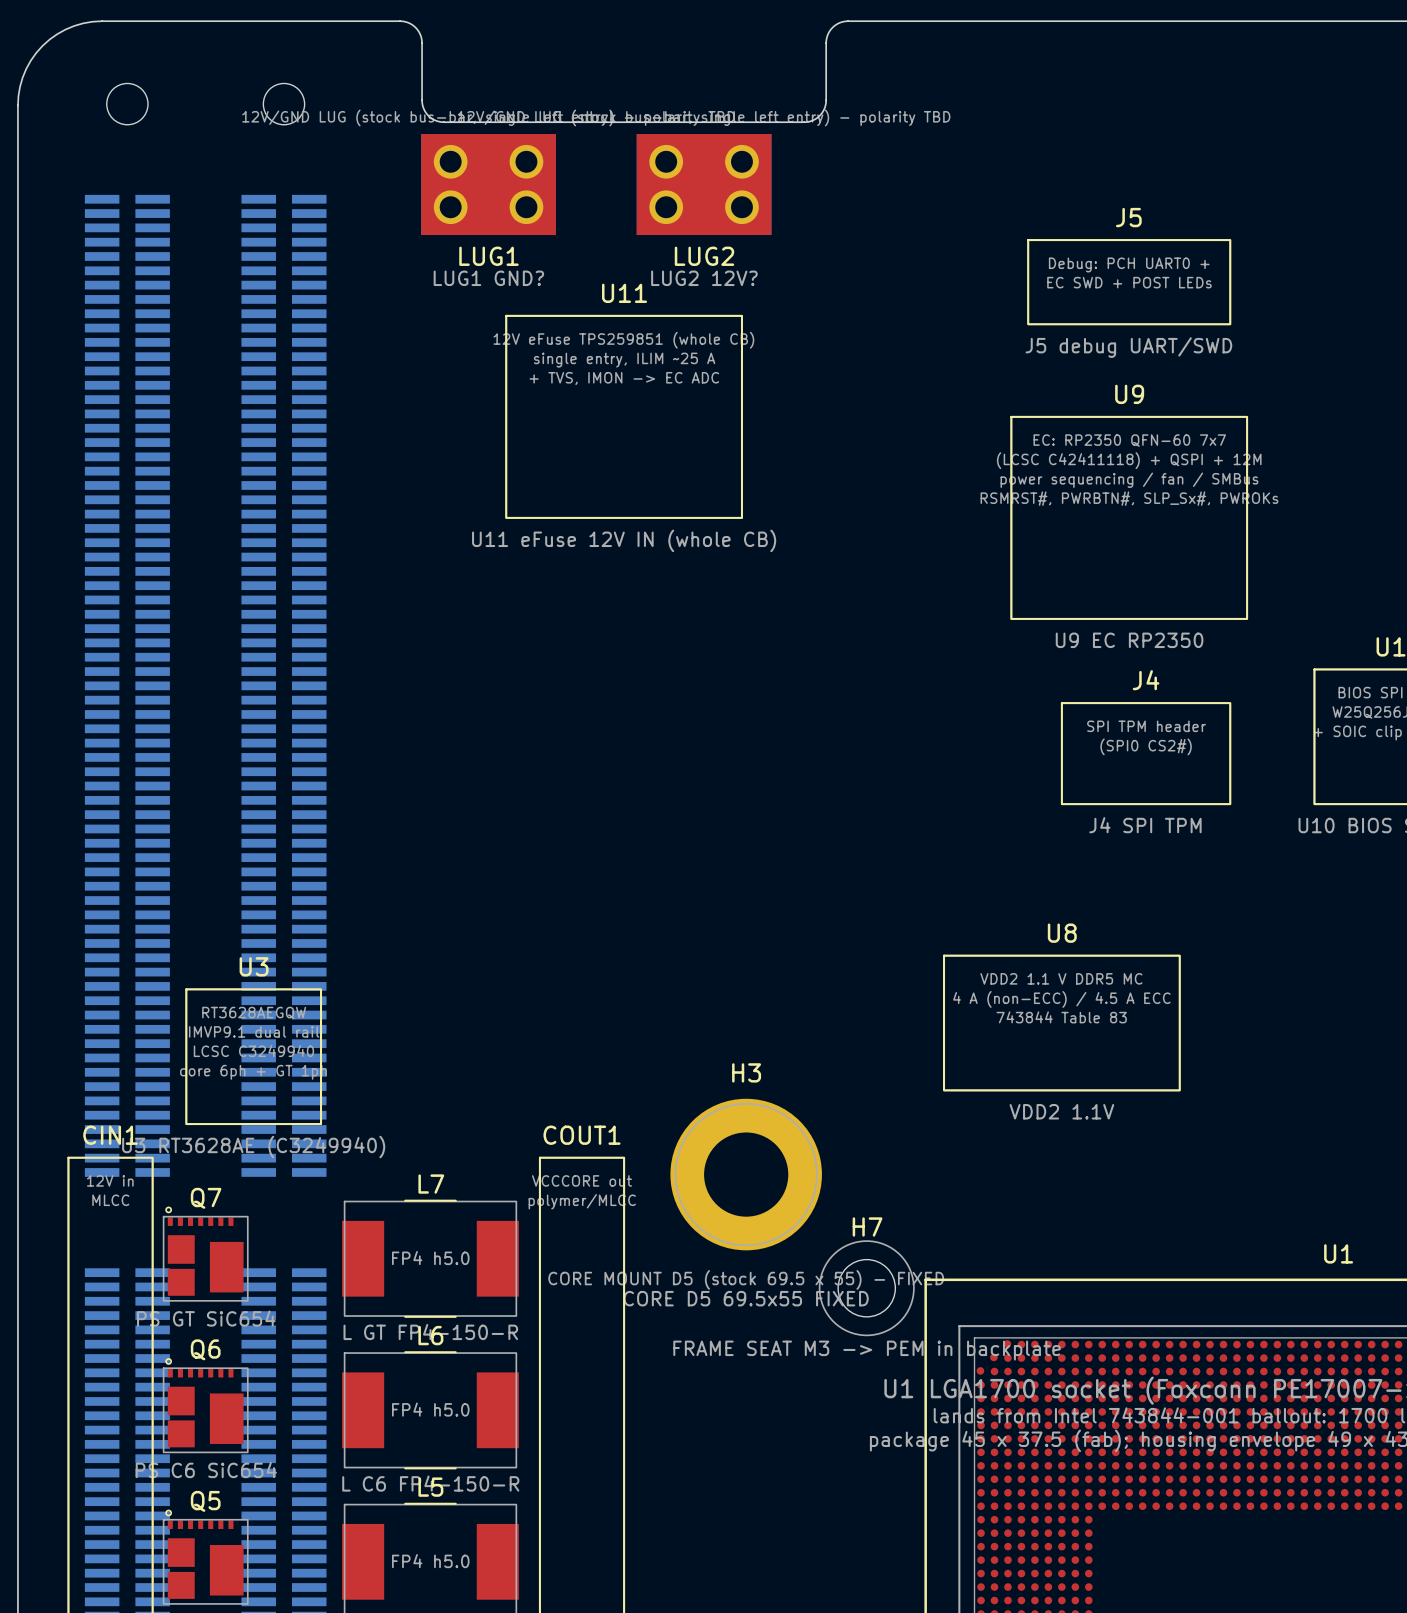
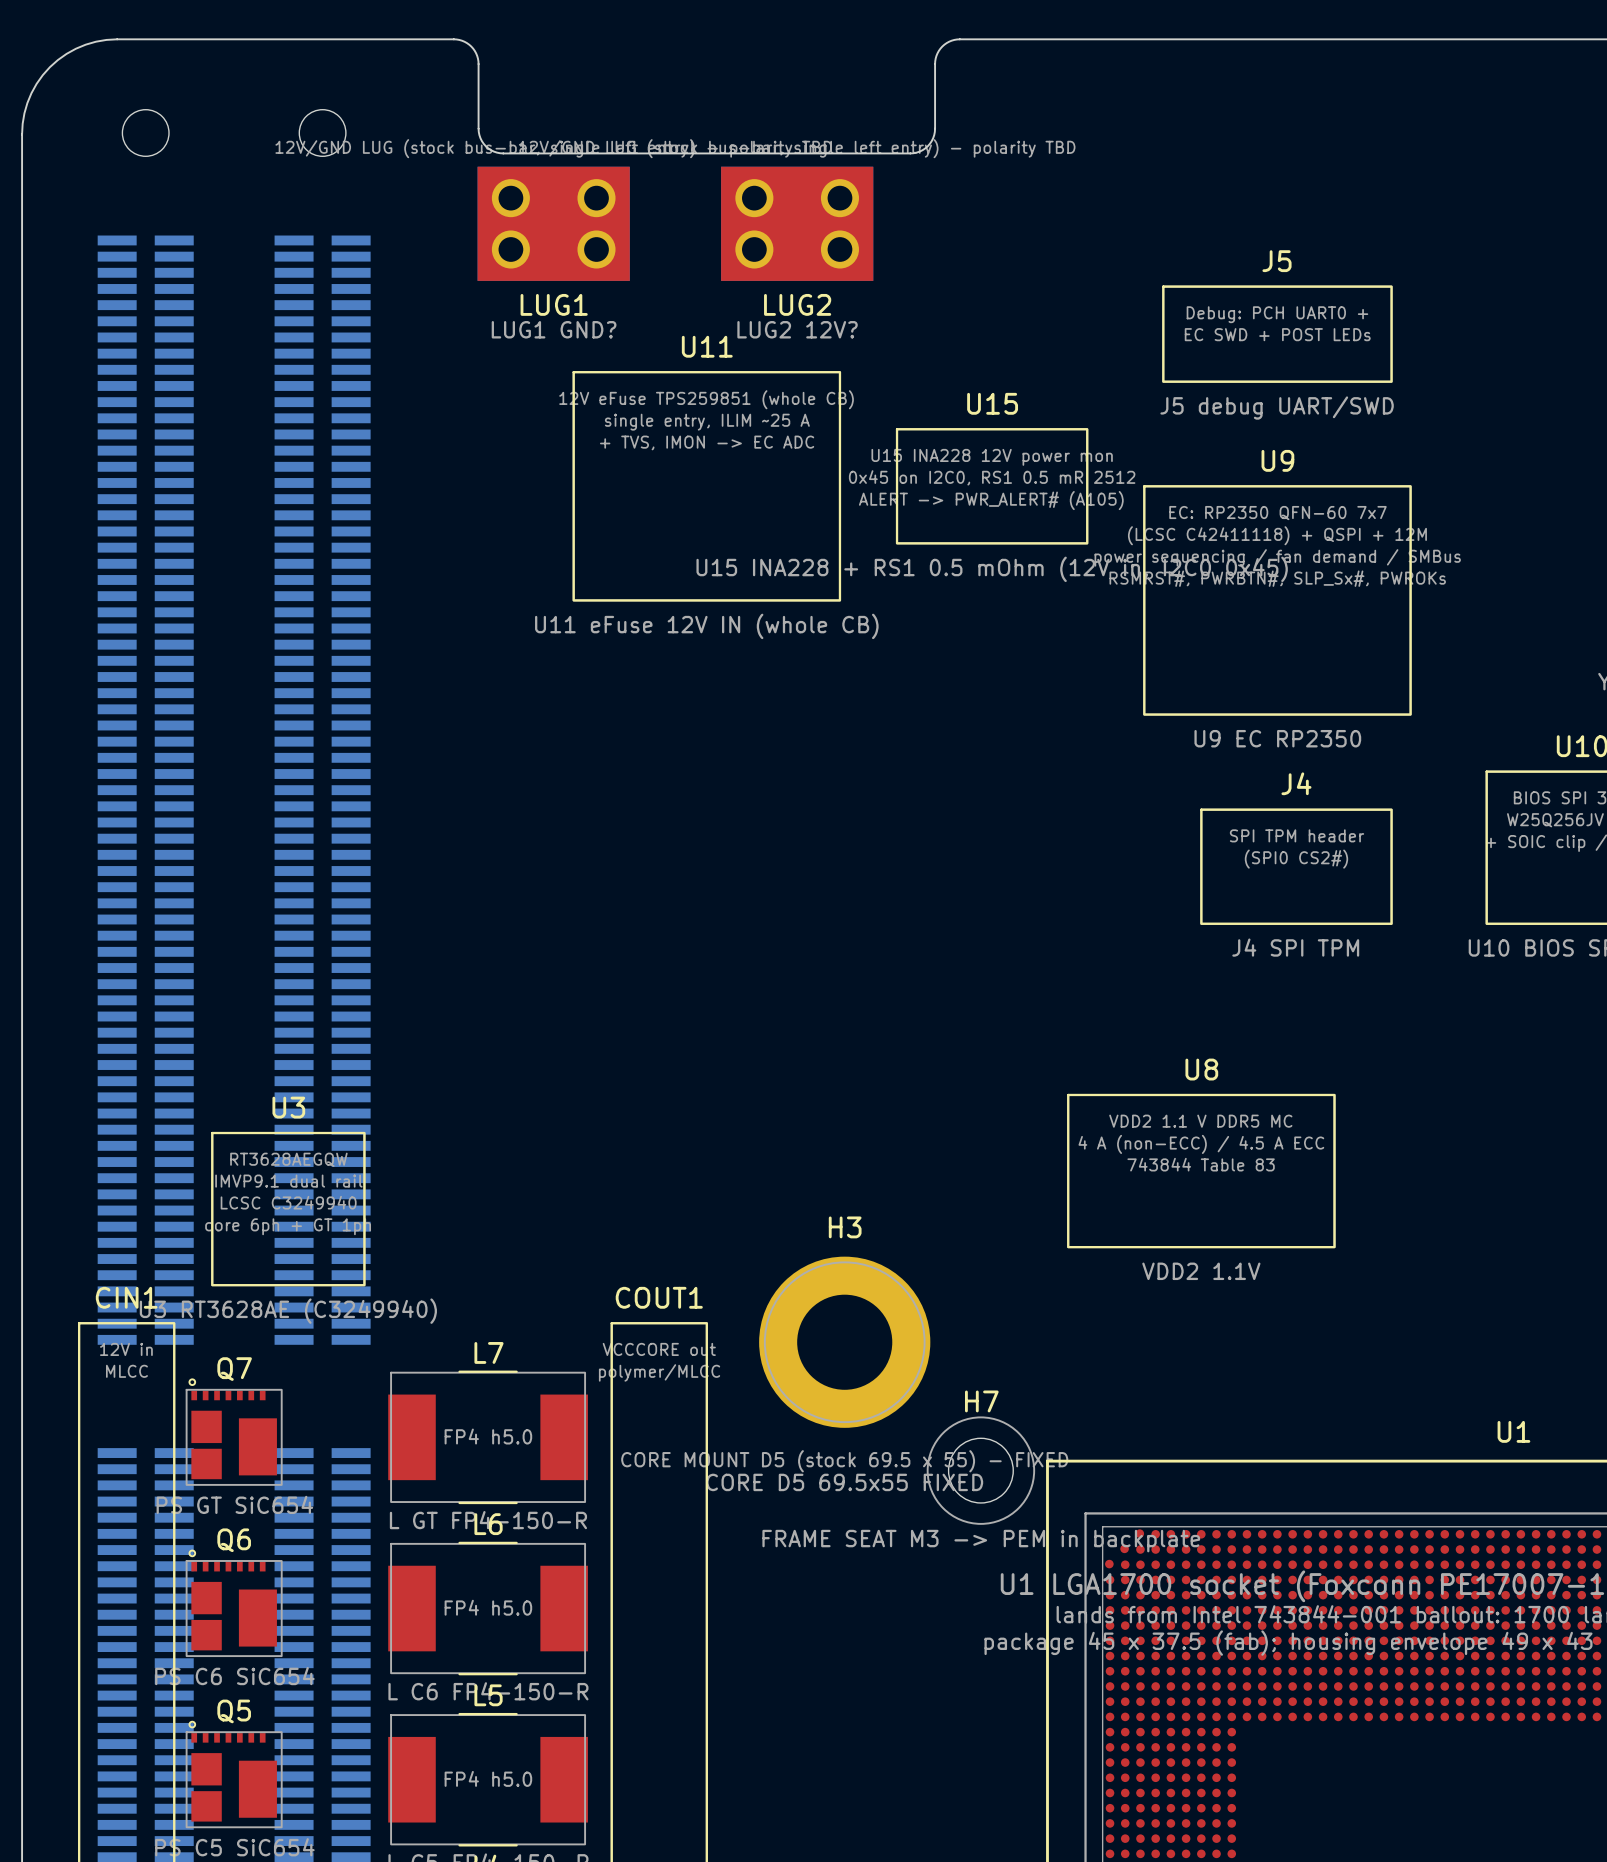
U15: none -> U15 INA228 + RS1 0.5 mOhm (12V in, I2C0 0x45) (992, 486)
U9 text: power sequencing / fan / SMBus (1129, 480) -> power sequencing / fan demand / SMBus (1277, 557)

